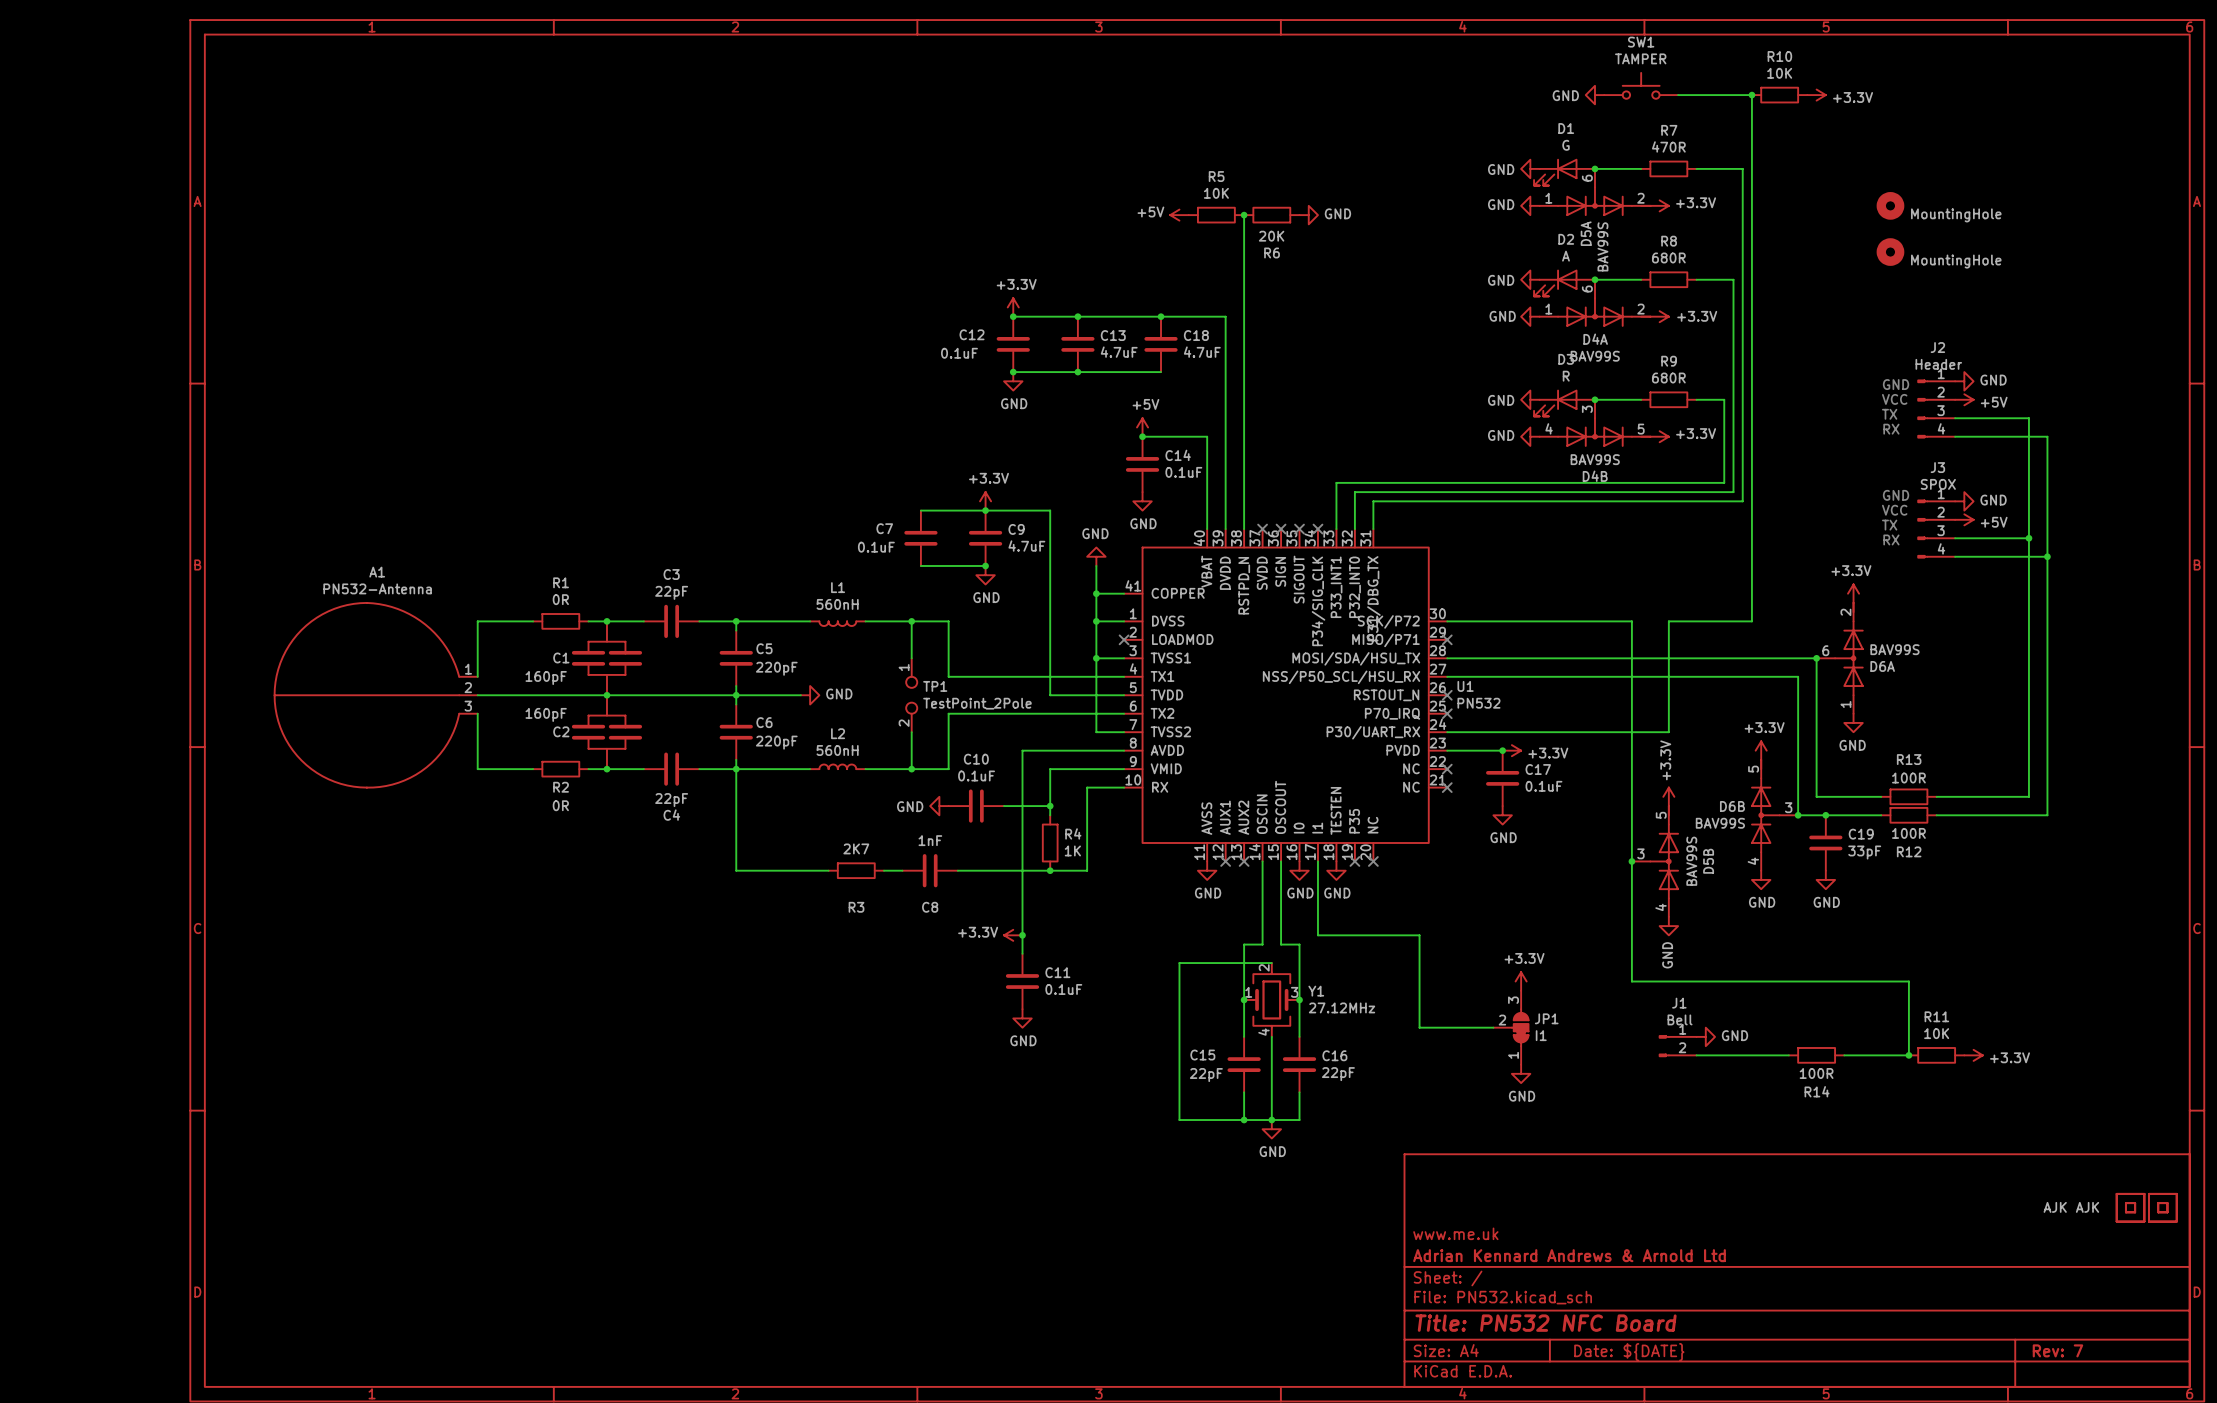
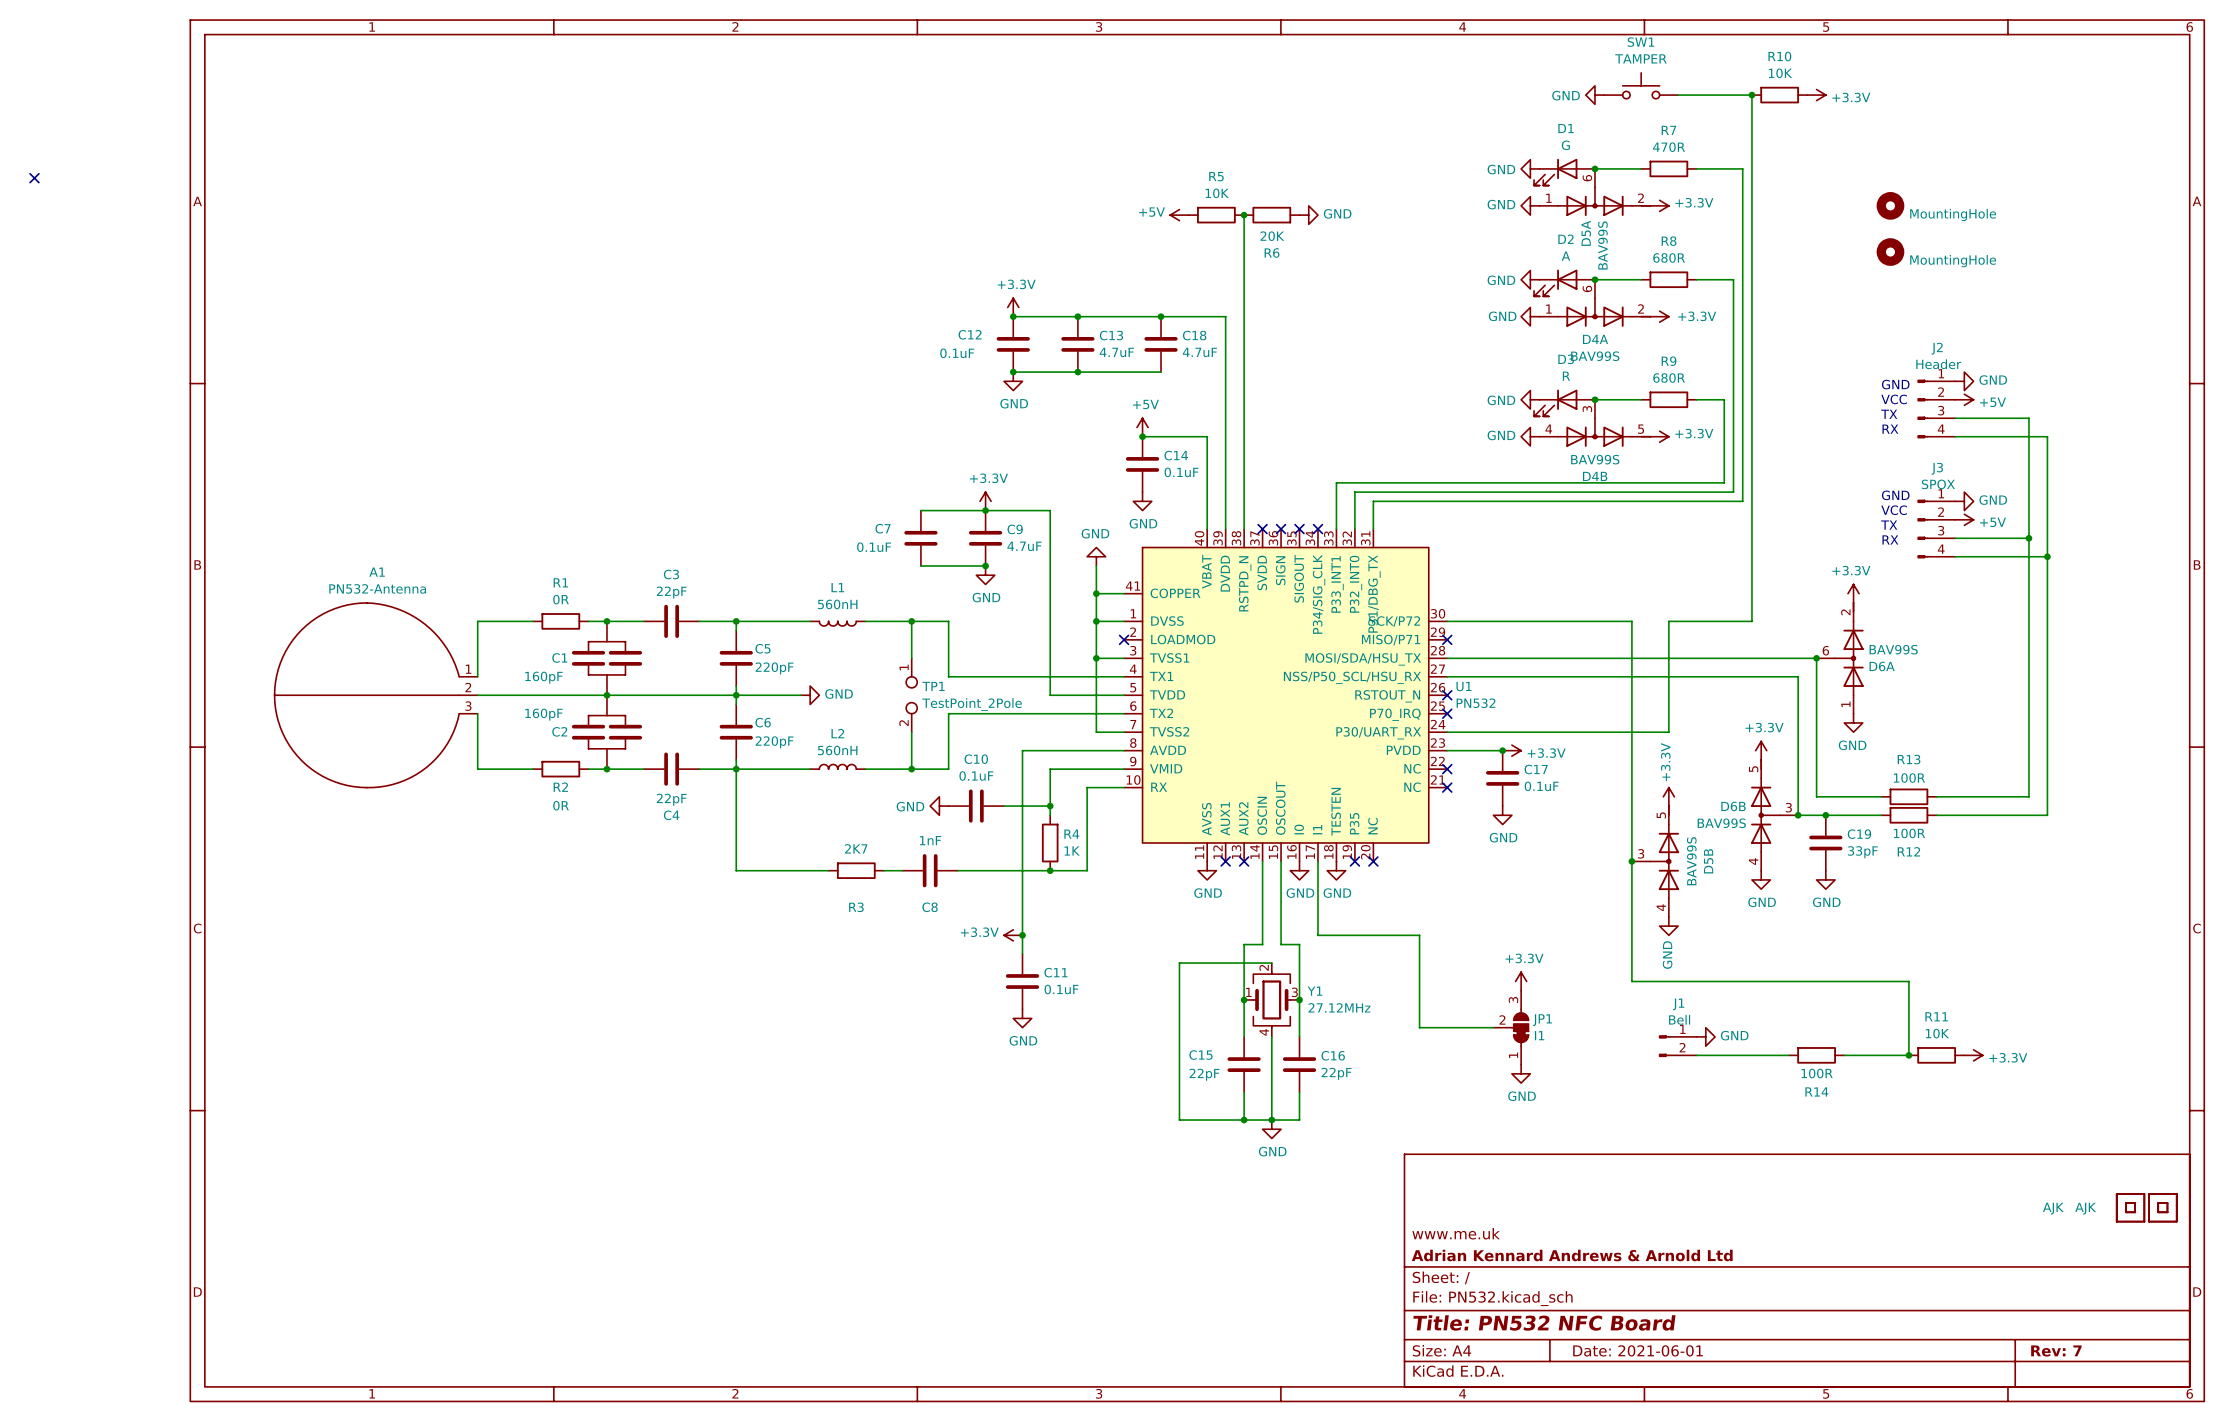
no-connect mark: none -> (34, 178)
title block: Date: ${DATE} (1629, 1352) -> Date: 2021-06-01 (1638, 1350)

